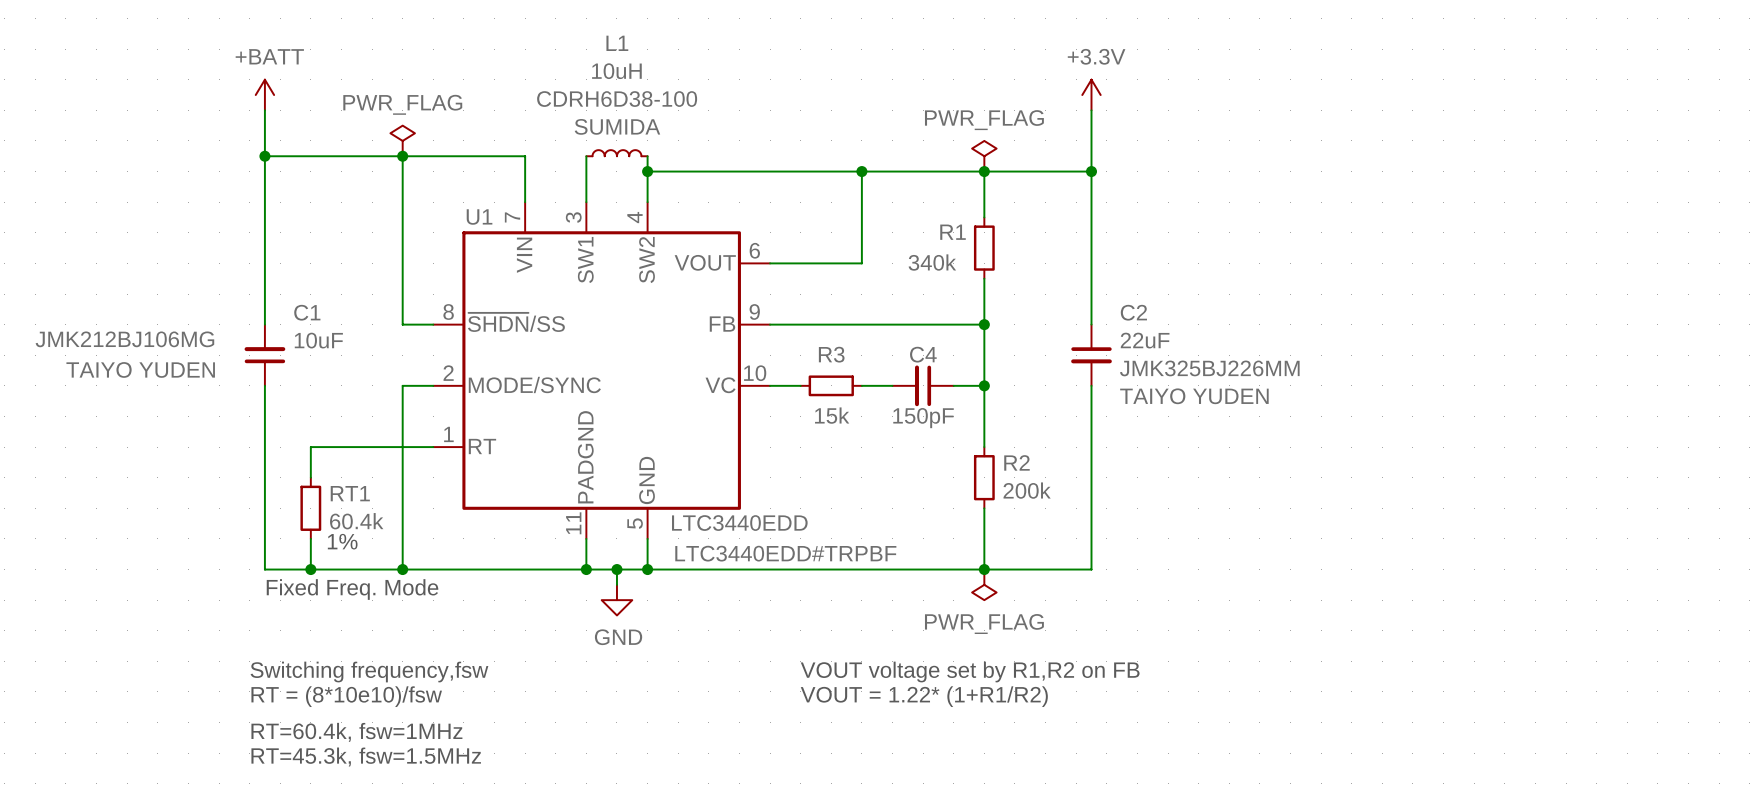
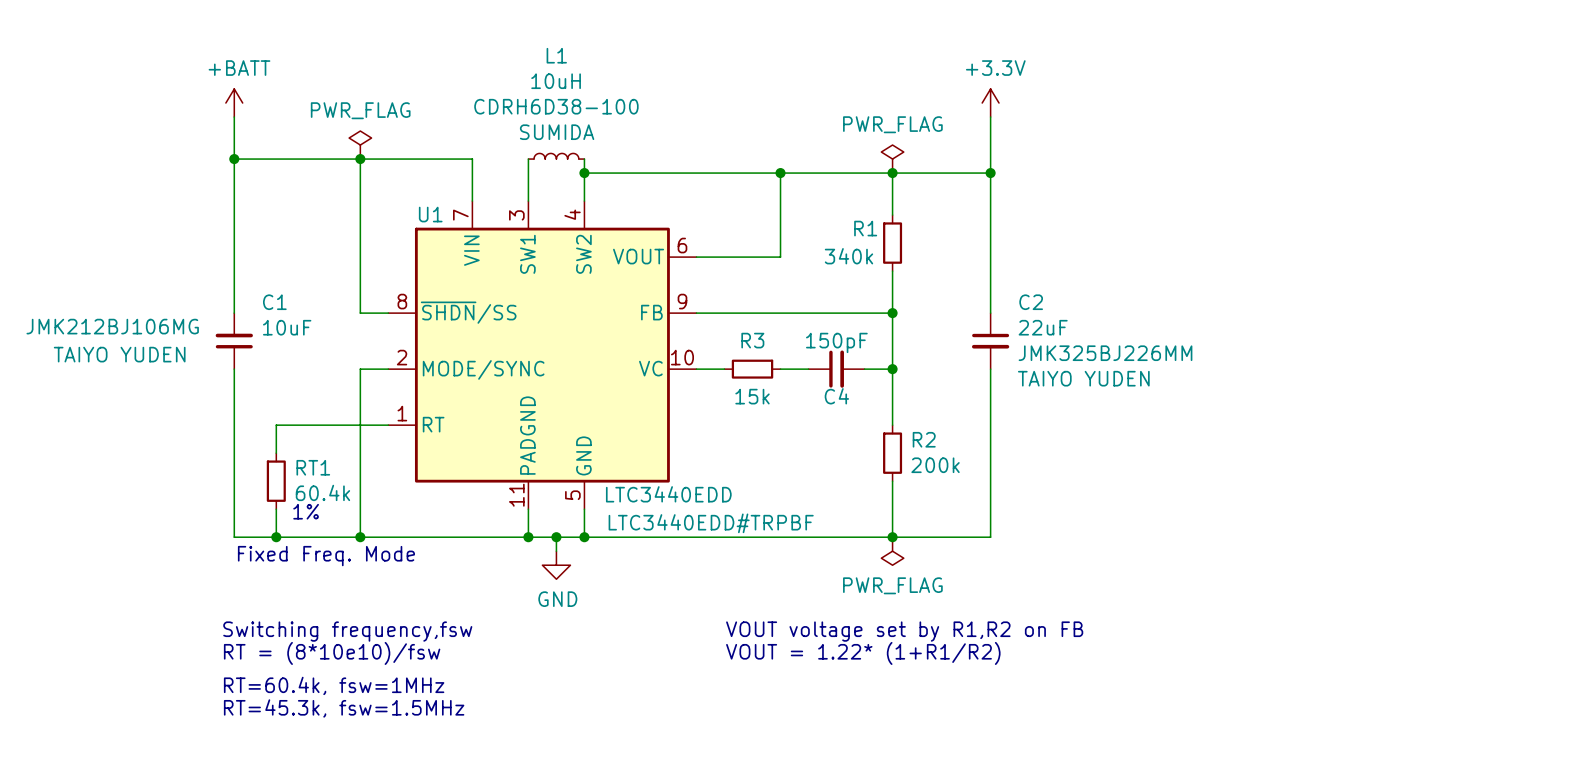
C4 rotation: 0° (923, 385) -> 180° (836, 369)

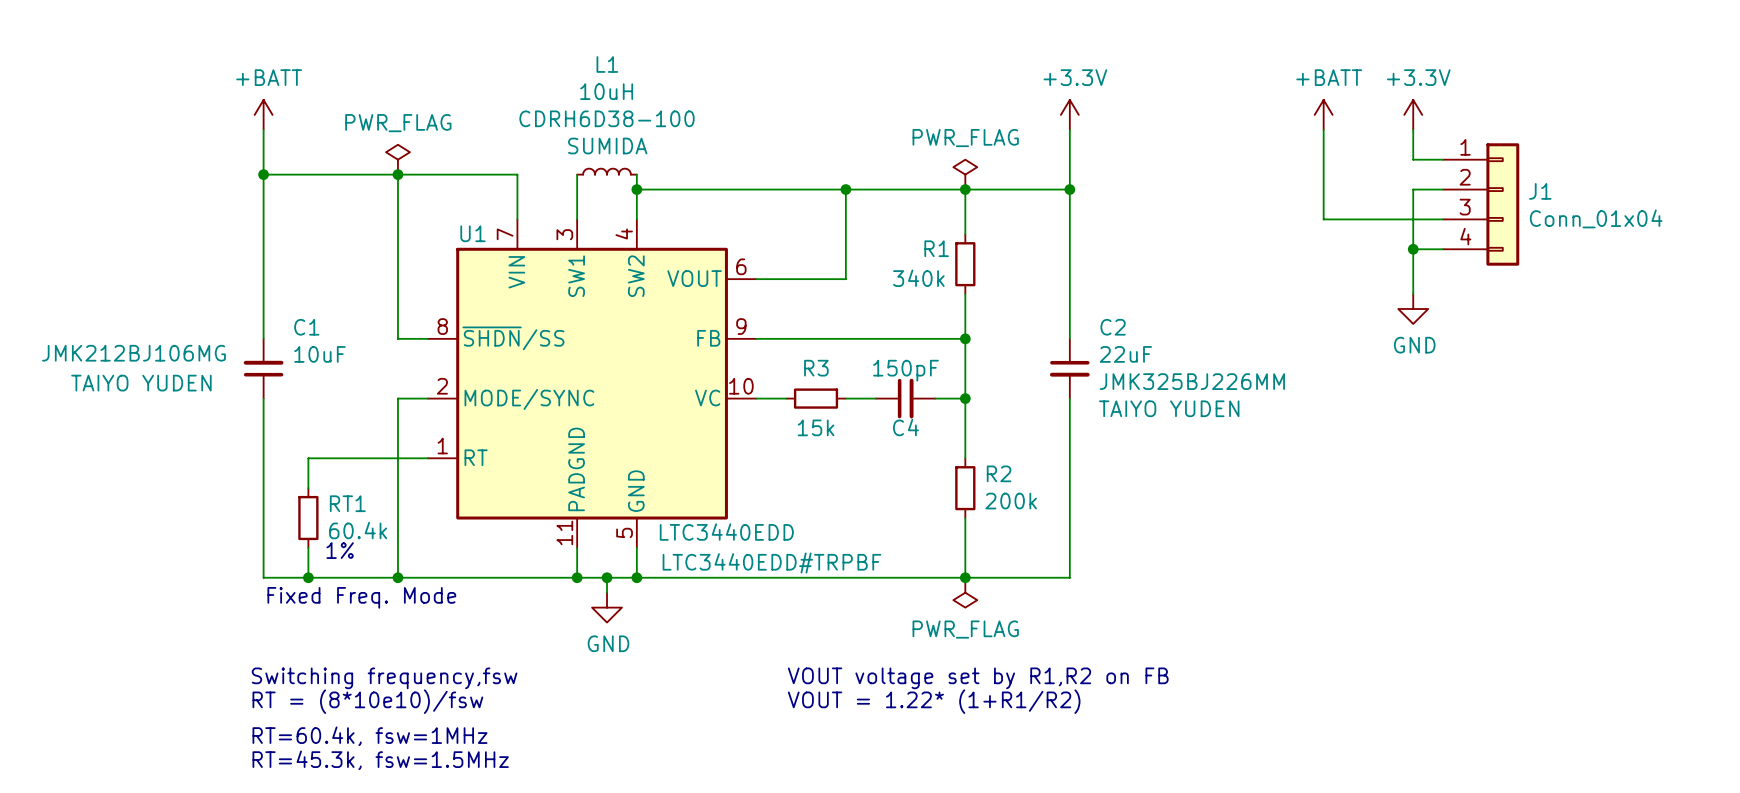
power symbol: none -> +BATT (1323, 114)
power symbol: none -> +3.3V (1413, 114)
wire: none -> (1323, 129) (1323, 219) (1443, 219)
wire: none -> (1413, 129) (1413, 159) (1443, 159)
wire: none -> (1443, 189) (1413, 189) (1413, 294)
J1: none -> Conn_01x04 (1481, 204)
wire: none -> (1413, 249) (1443, 249)
junction: none -> (1413, 249)
power symbol: none -> GND (1413, 309)

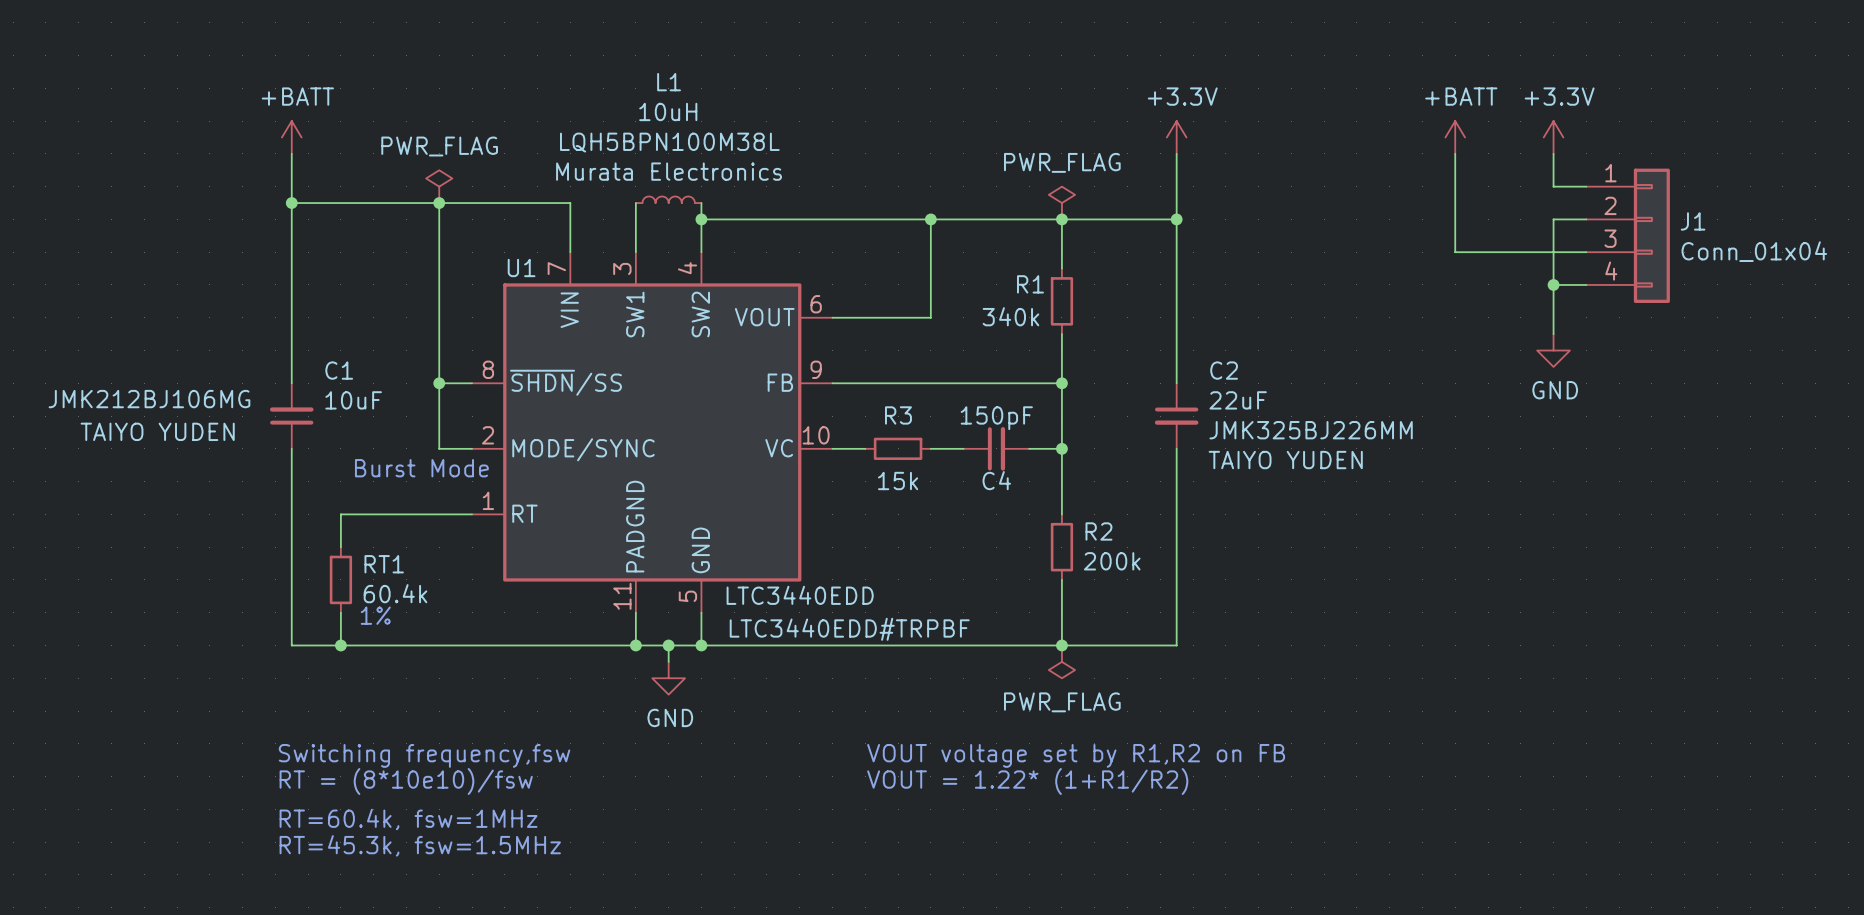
L1 text: CDRH6D38-100 (607, 118) -> LQH5BPN100M38L (669, 142)
L1 text: SUMIDA (607, 146) -> Murata Electronics (669, 171)
junction: none -> (439, 383)
wire: (397, 398) (397, 577) -> (439, 448) (439, 383)
text: none -> Burst Mode (421, 468)
junction: (397, 577) -> none
text: Fixed Freq. Mode (361, 597) -> none

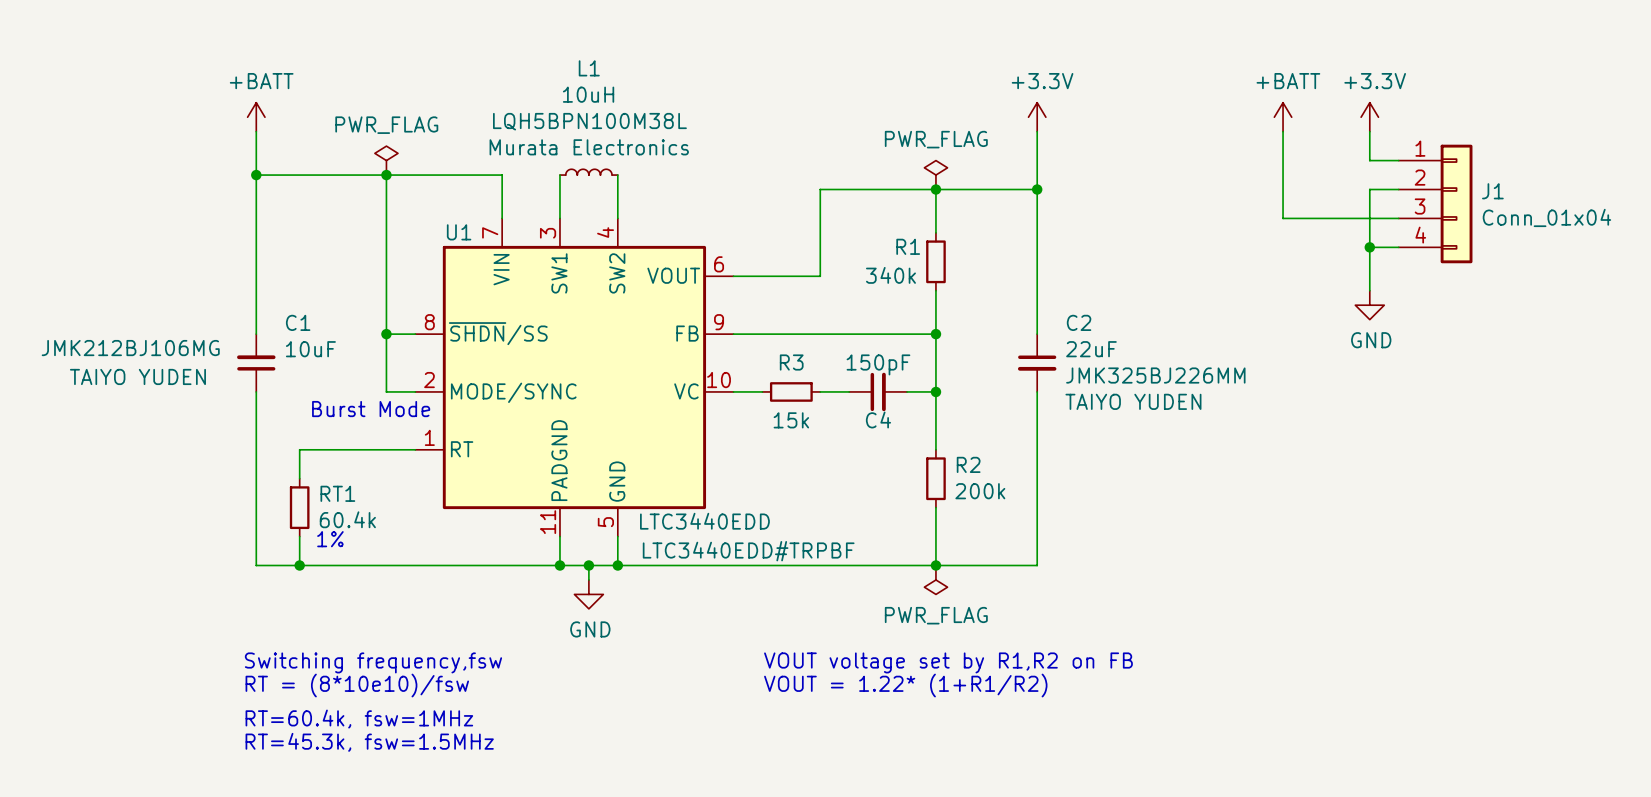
wire: (701, 219) (930, 219) -> none
junction: (701, 219) -> none
junction: (930, 219) -> none

